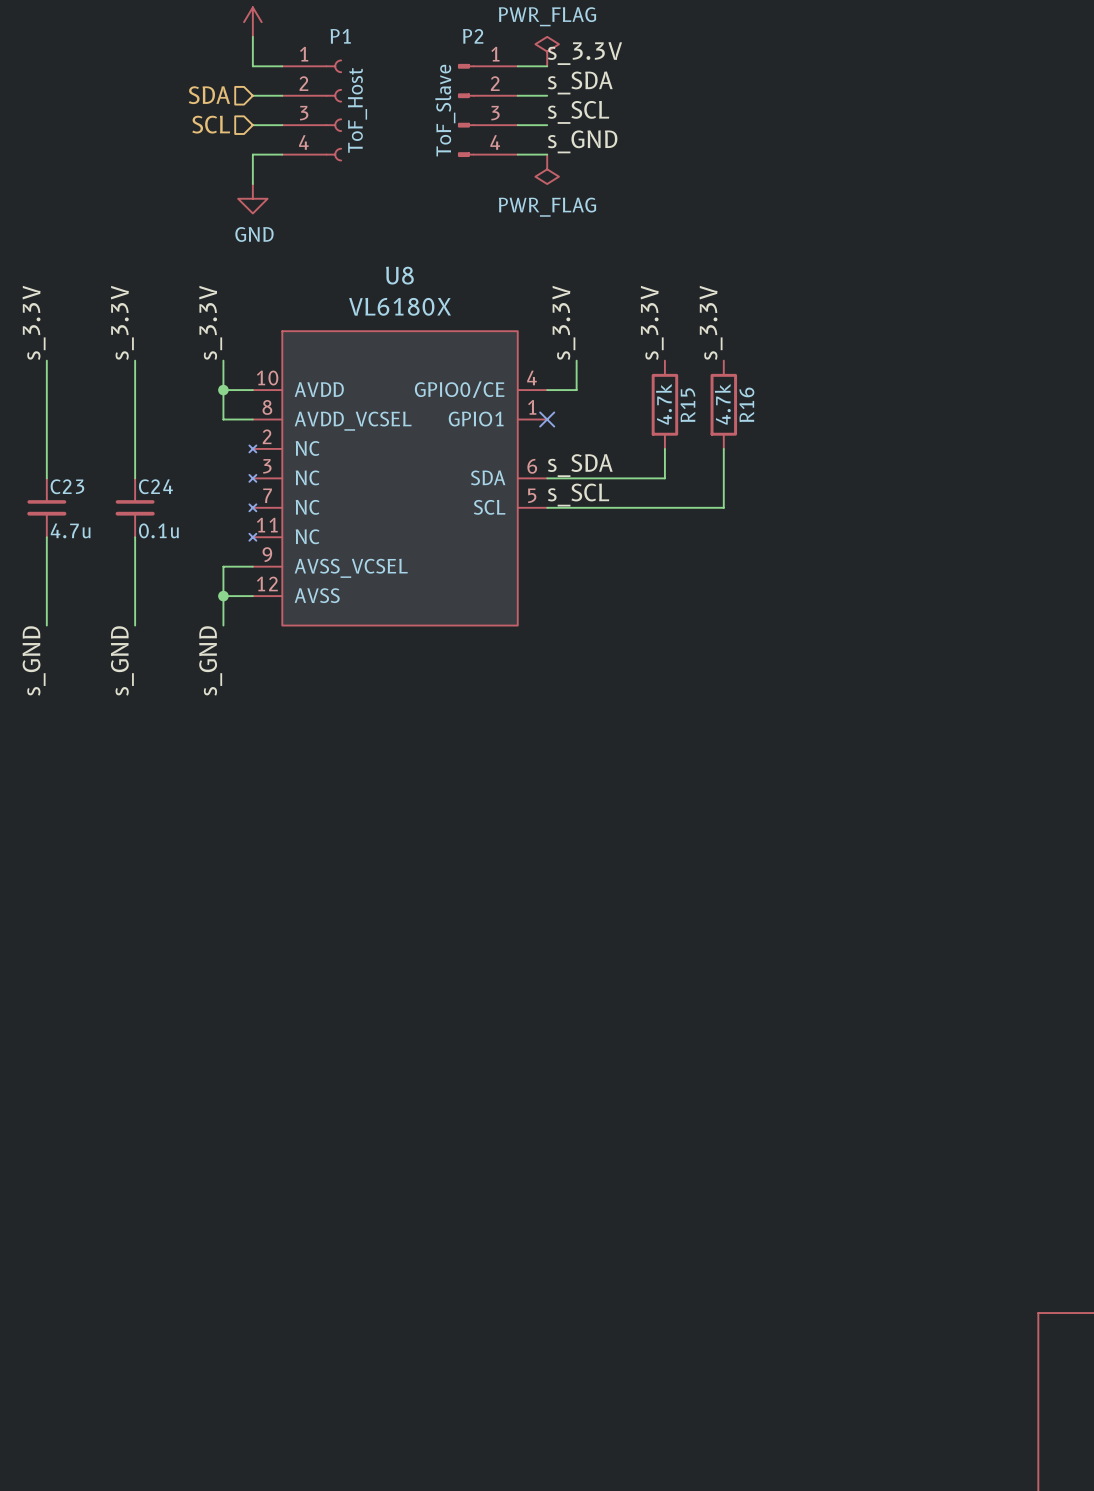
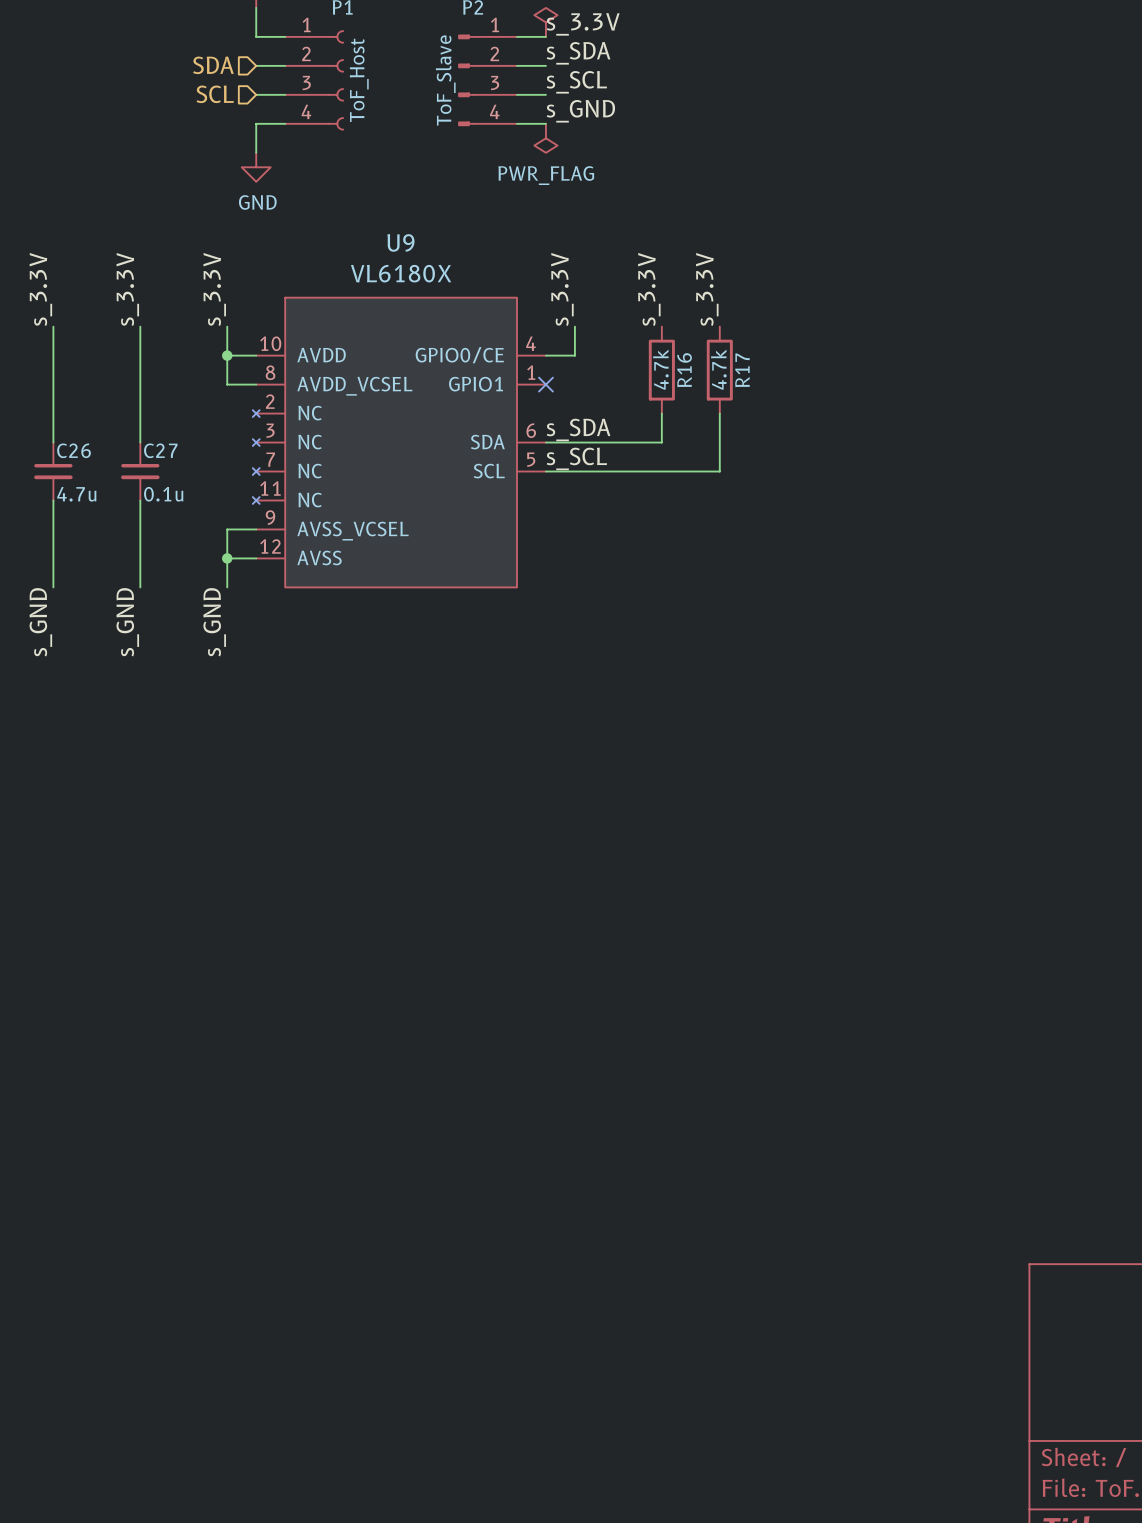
U8 name: U8 (399, 275) -> U9 (400, 242)
R16 name: R16 (746, 404) -> R17 (742, 370)
R15 name: R15 (687, 405) -> R16 (684, 370)
C23 name: C23 (67, 486) -> C26 (74, 450)
C24 name: C24 (155, 486) -> C27 (160, 450)

